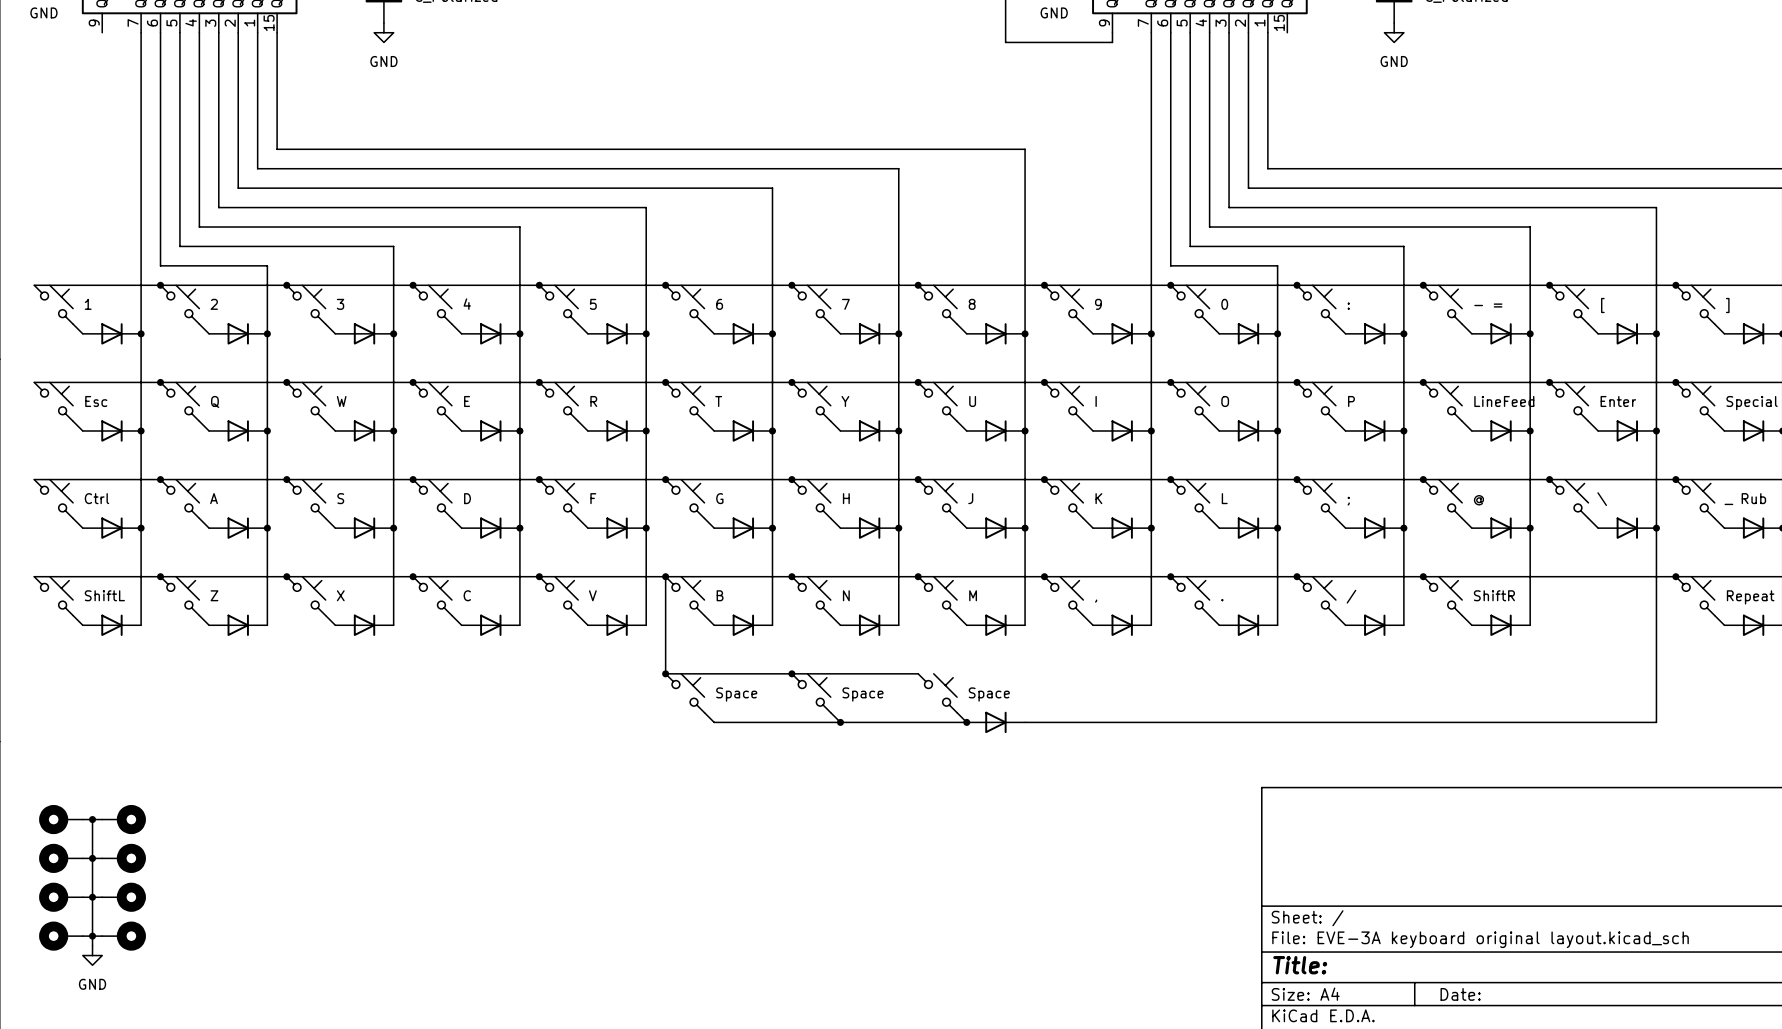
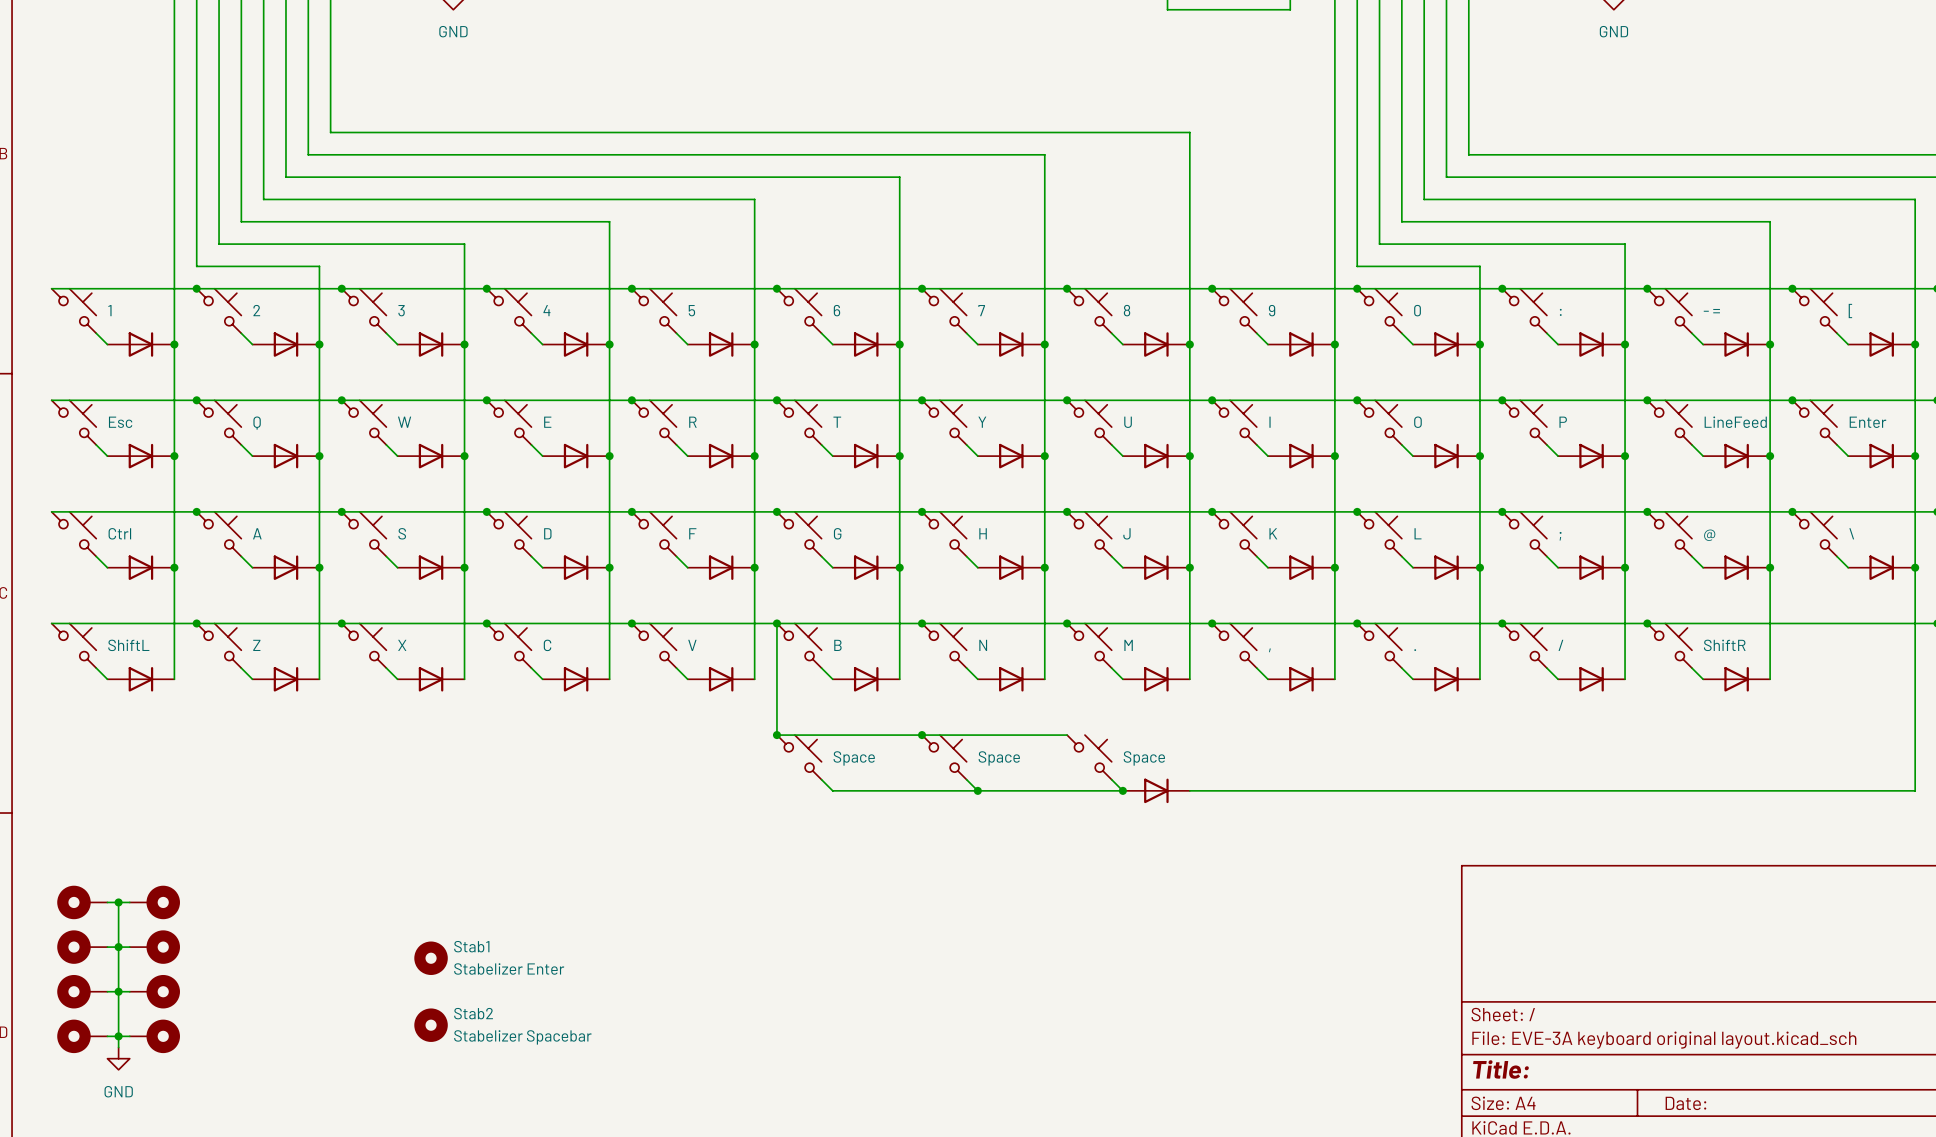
Stab1: none -> Stabelizer Enter (431, 958)
Stab2: none -> Stabelizer Spacebar (431, 1025)

